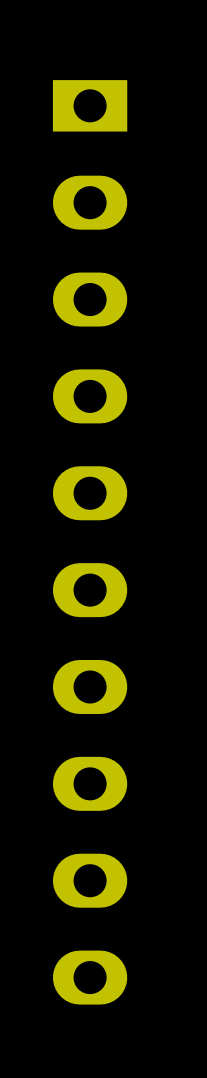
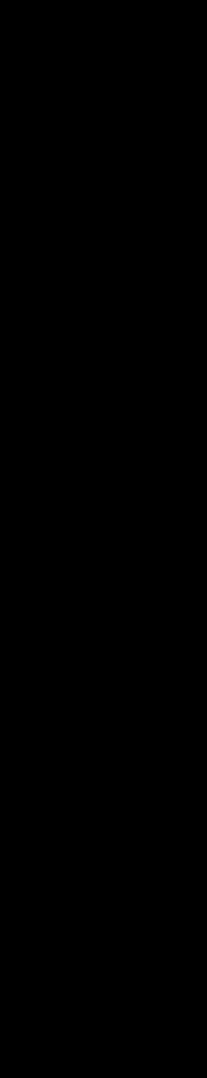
part: (90, 542) -> none

